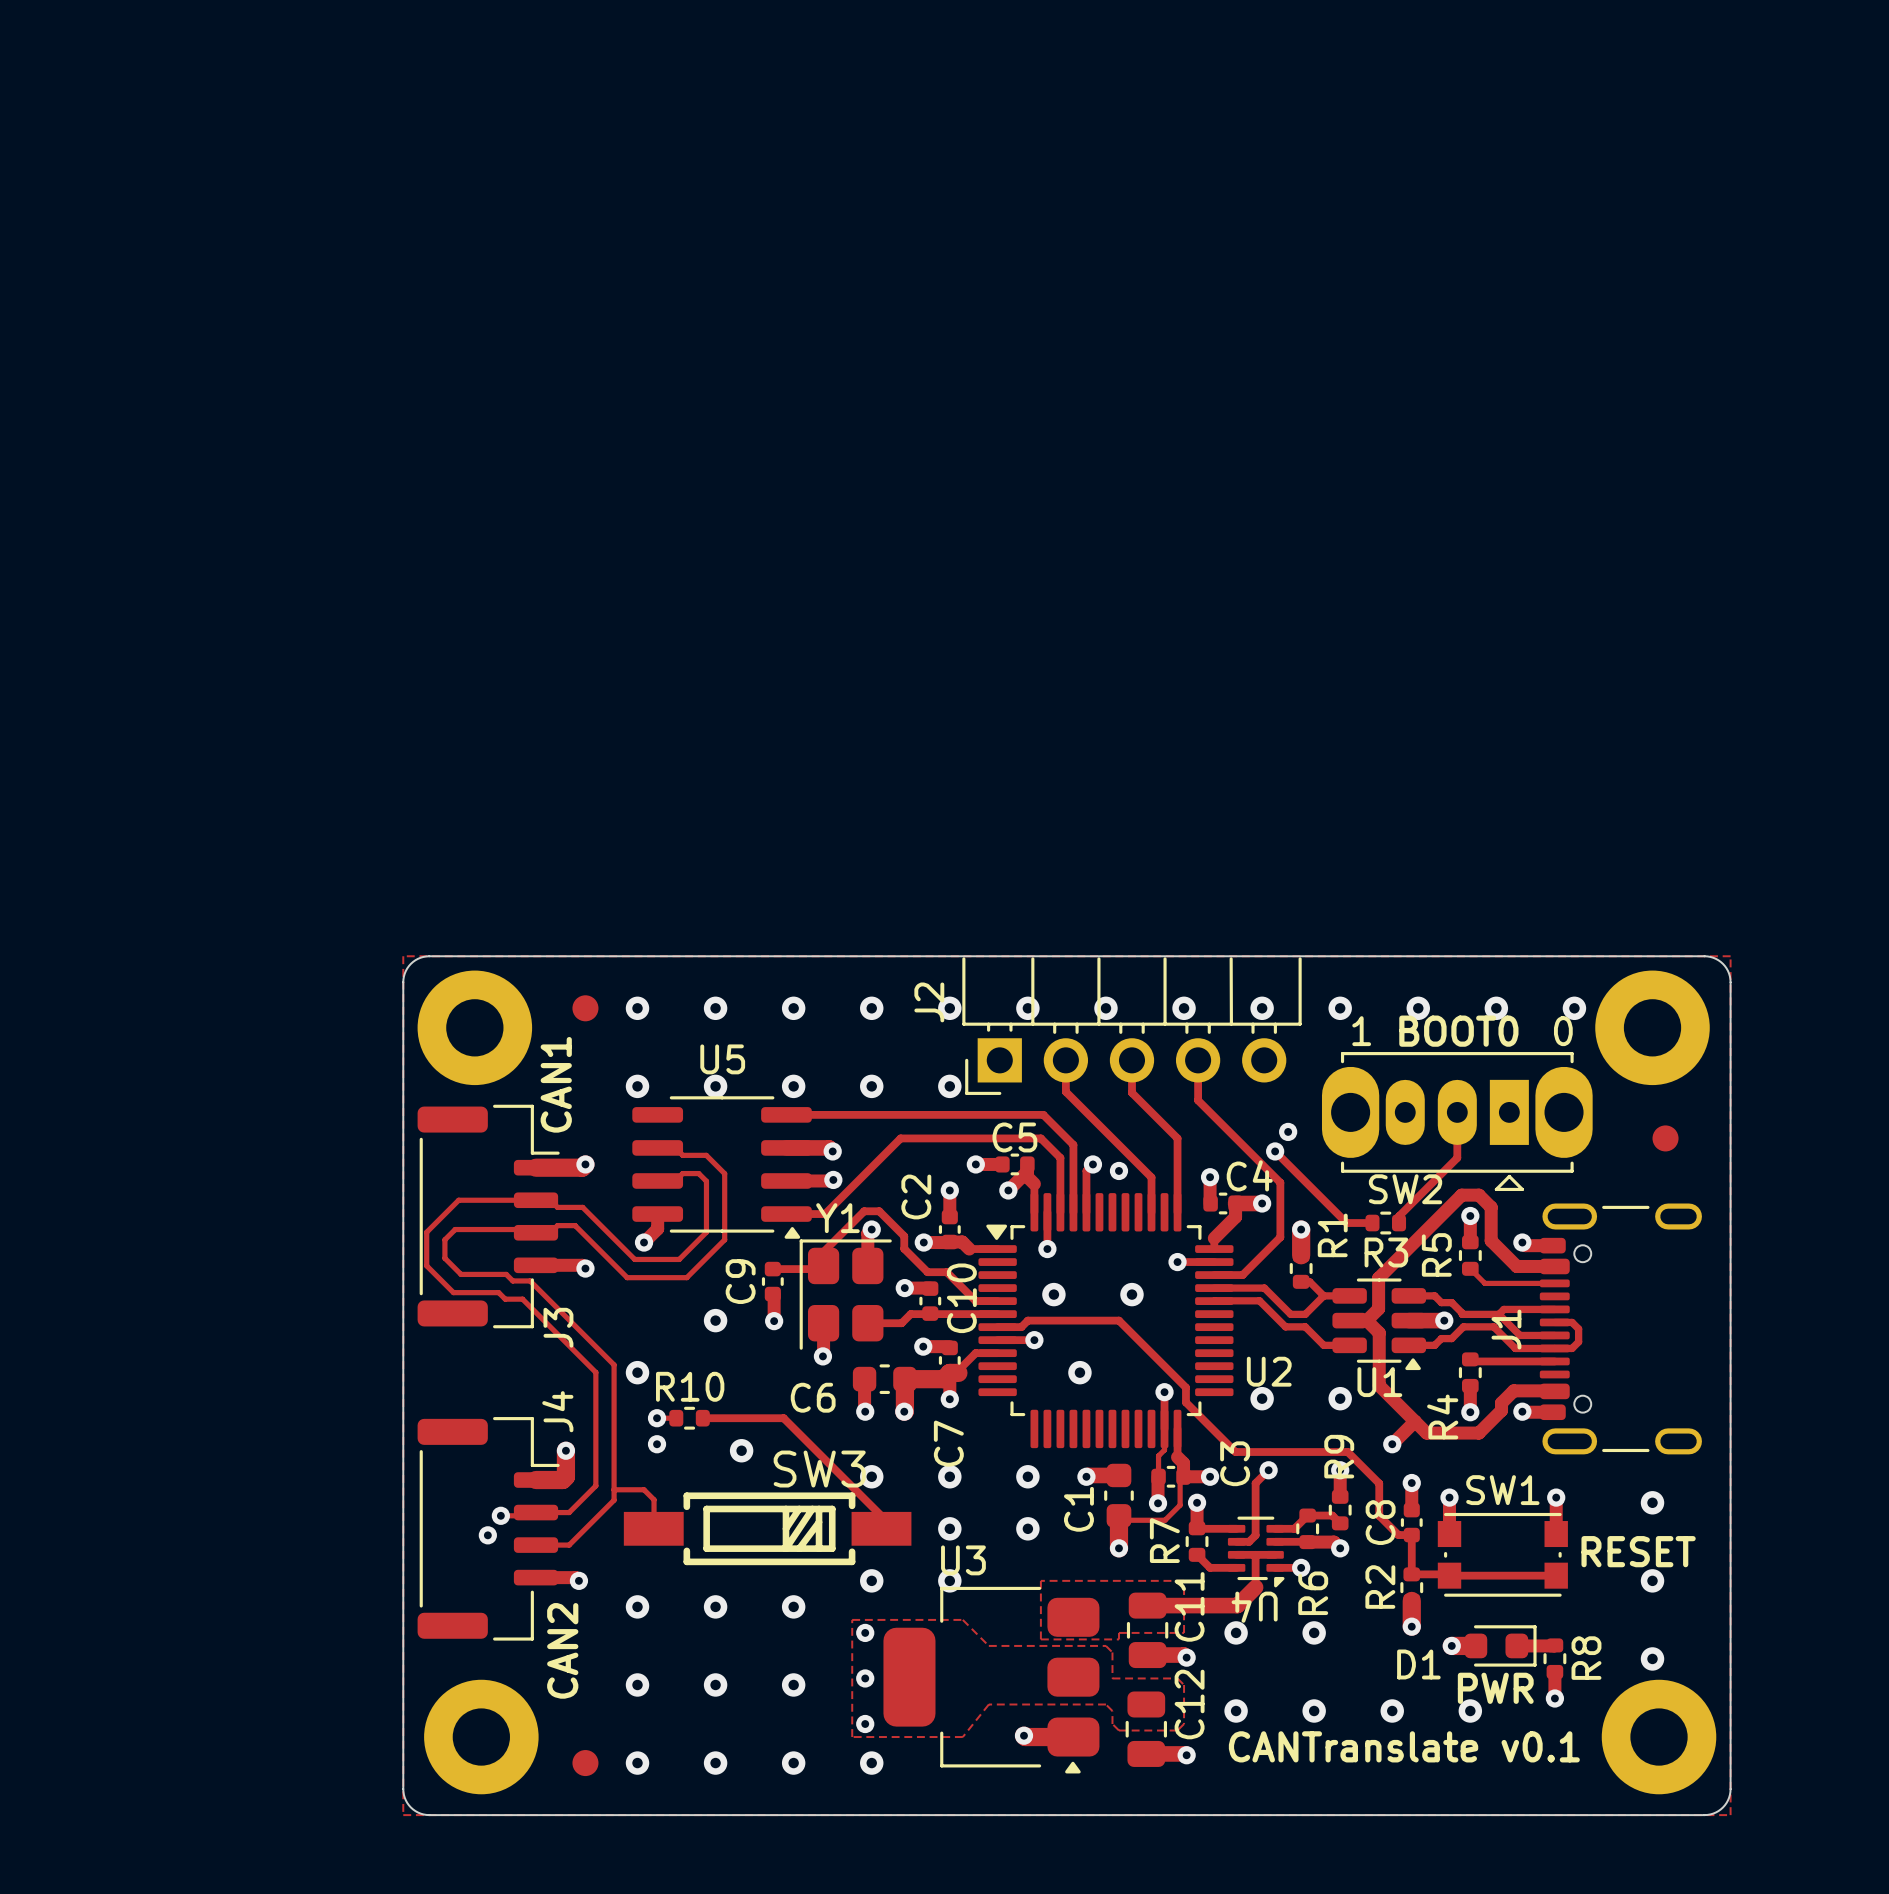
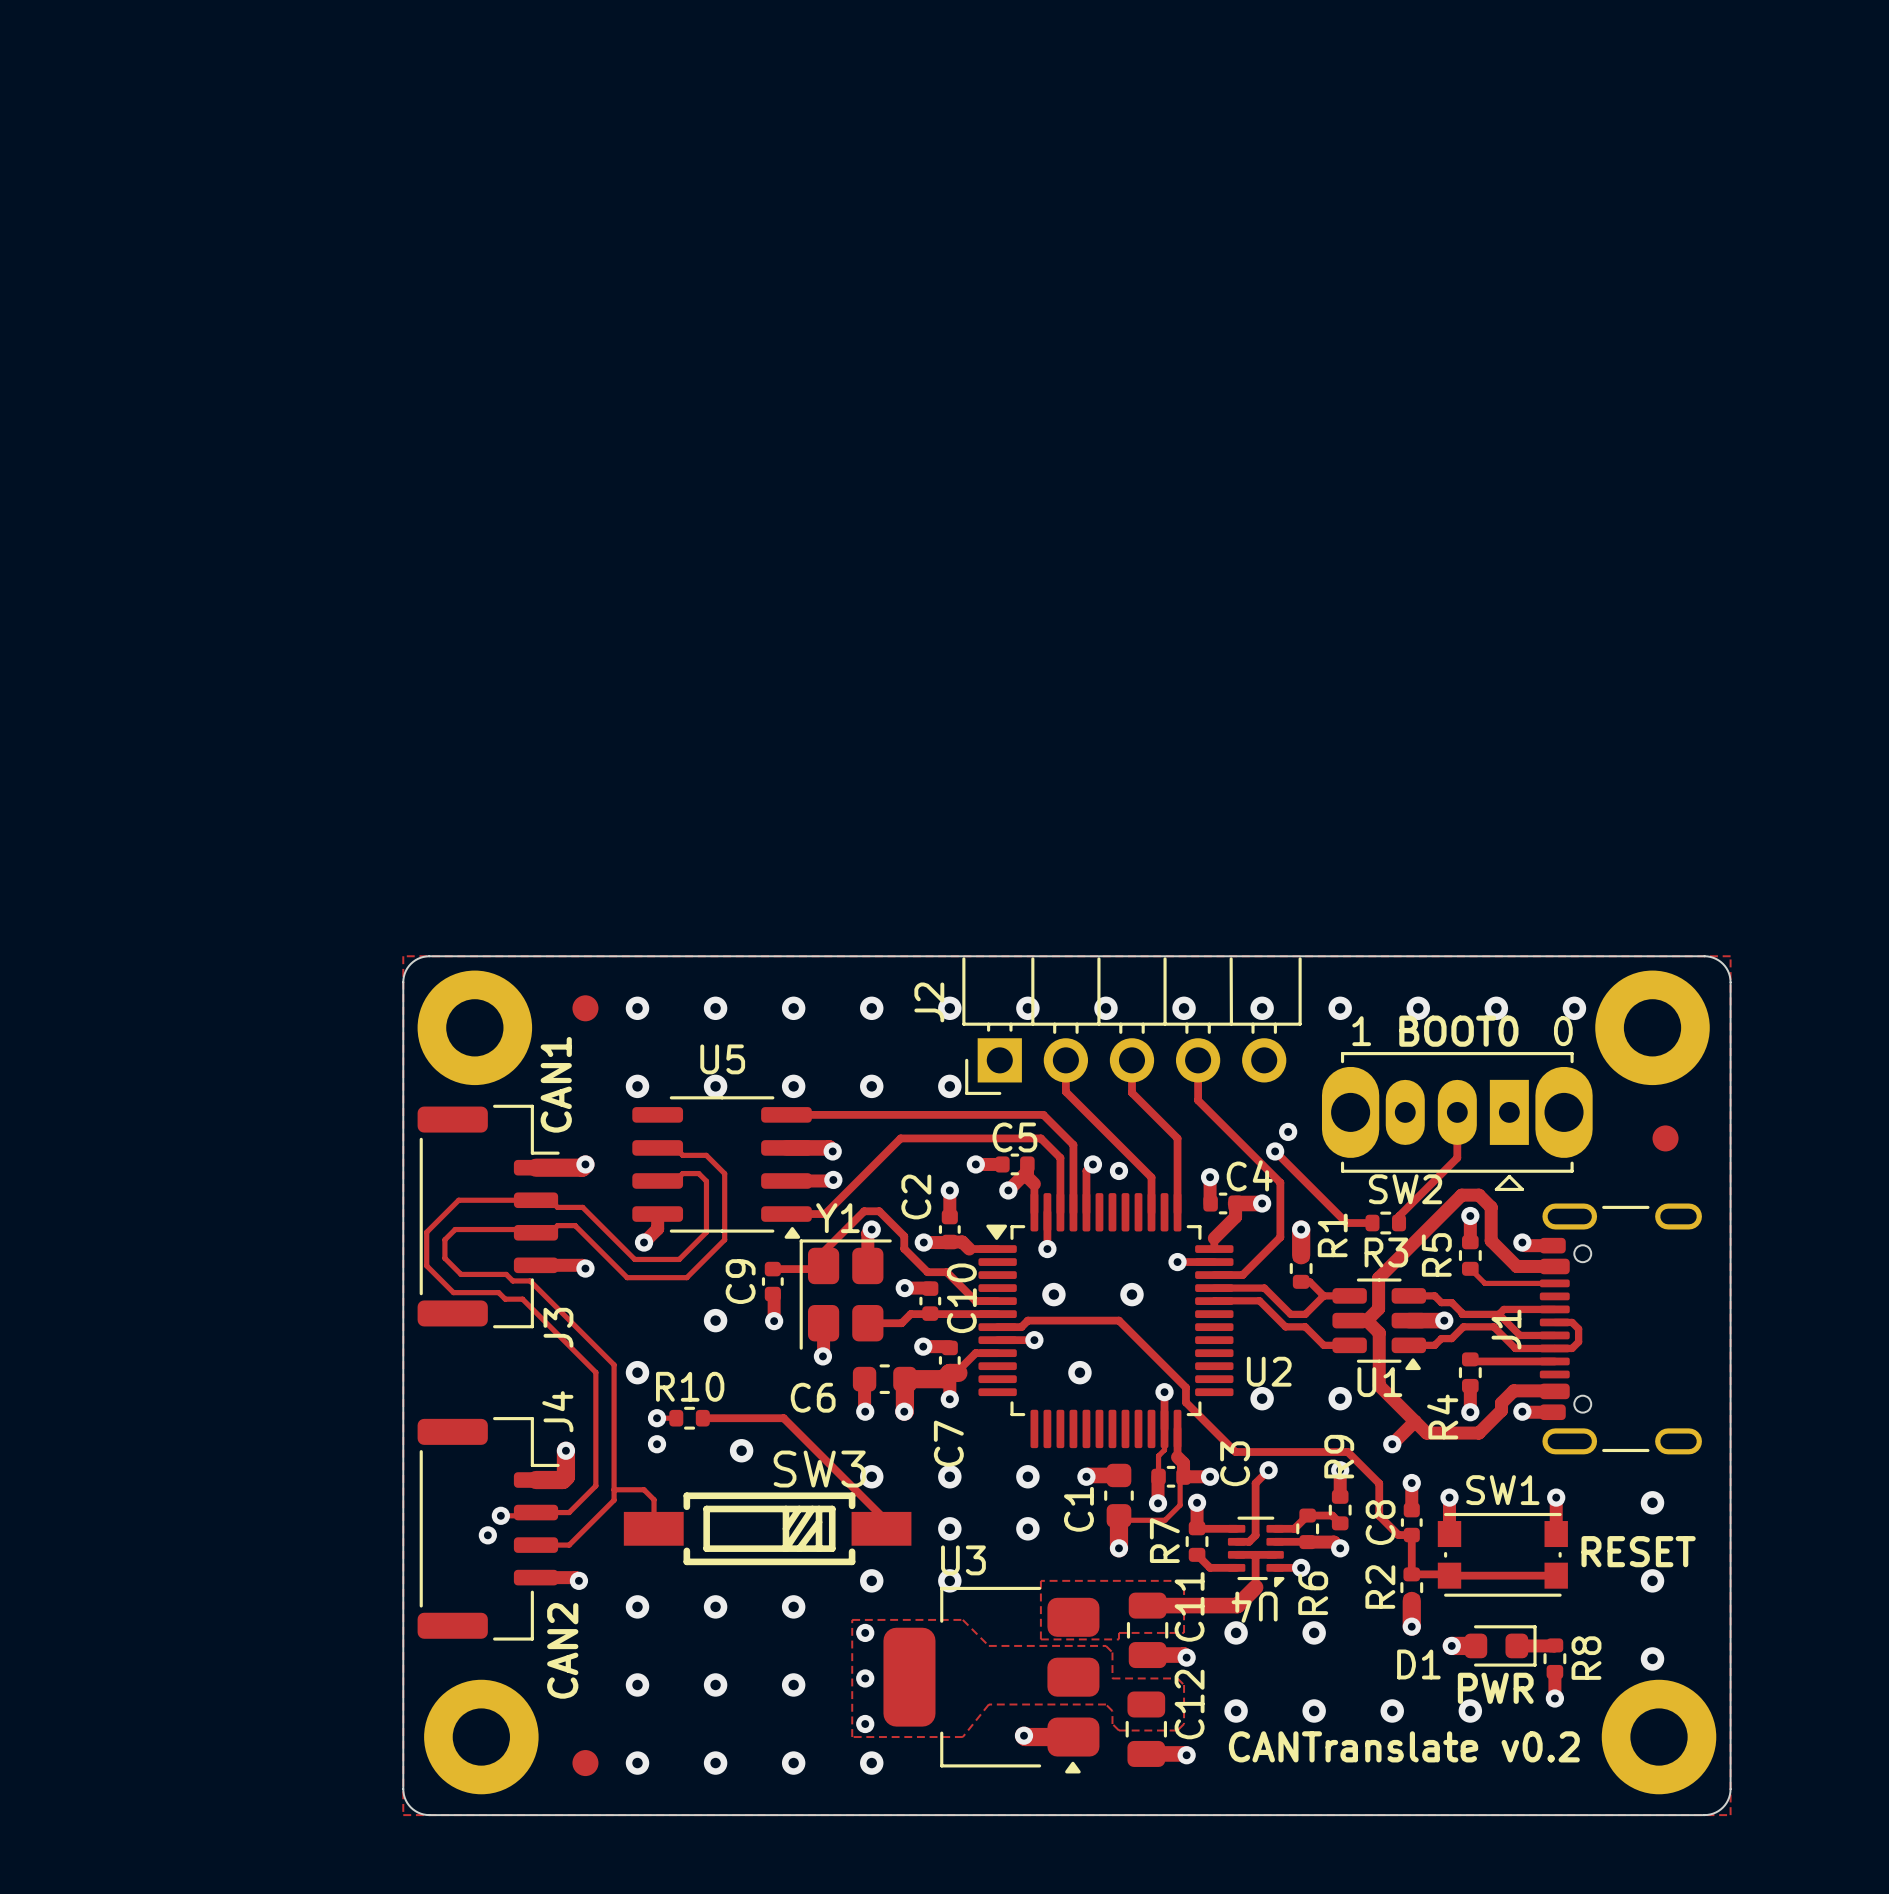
text: CANTranslate v0.1 (1404, 1746) -> CANTranslate v0.2 (1404, 1746)

